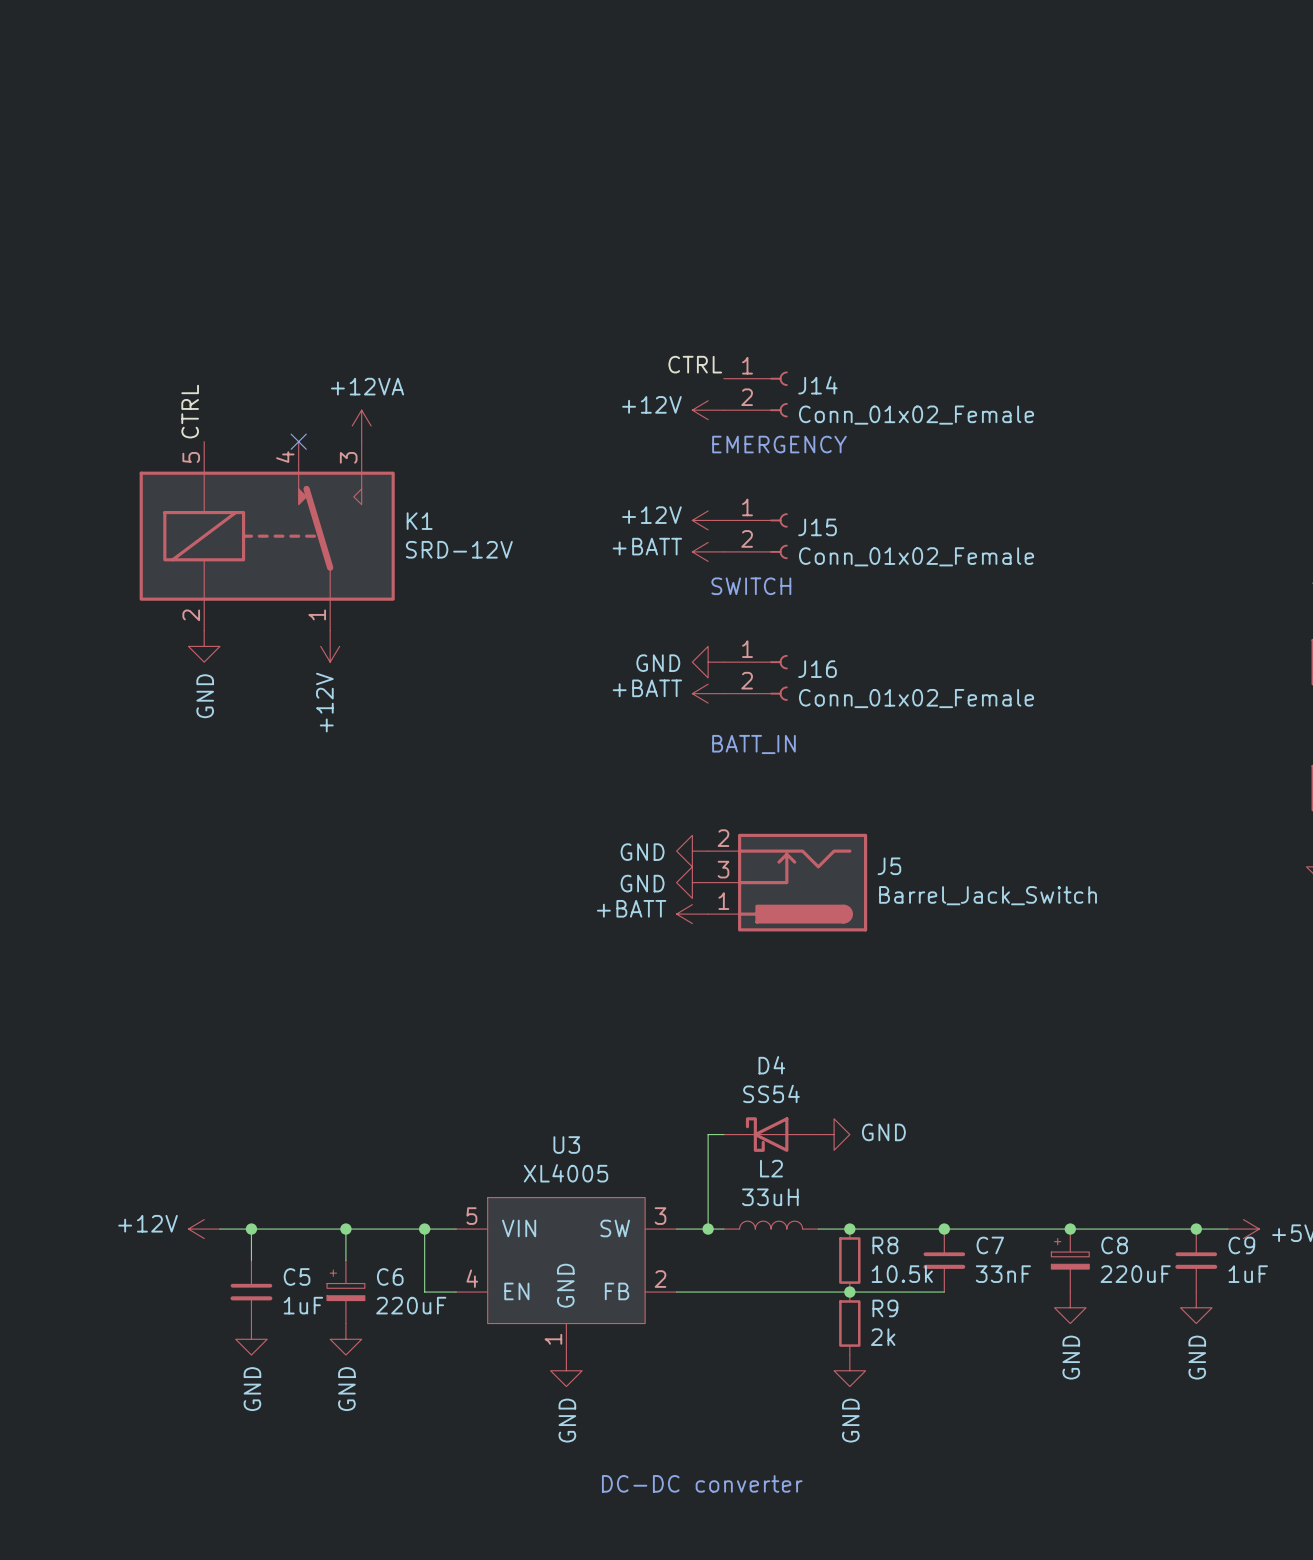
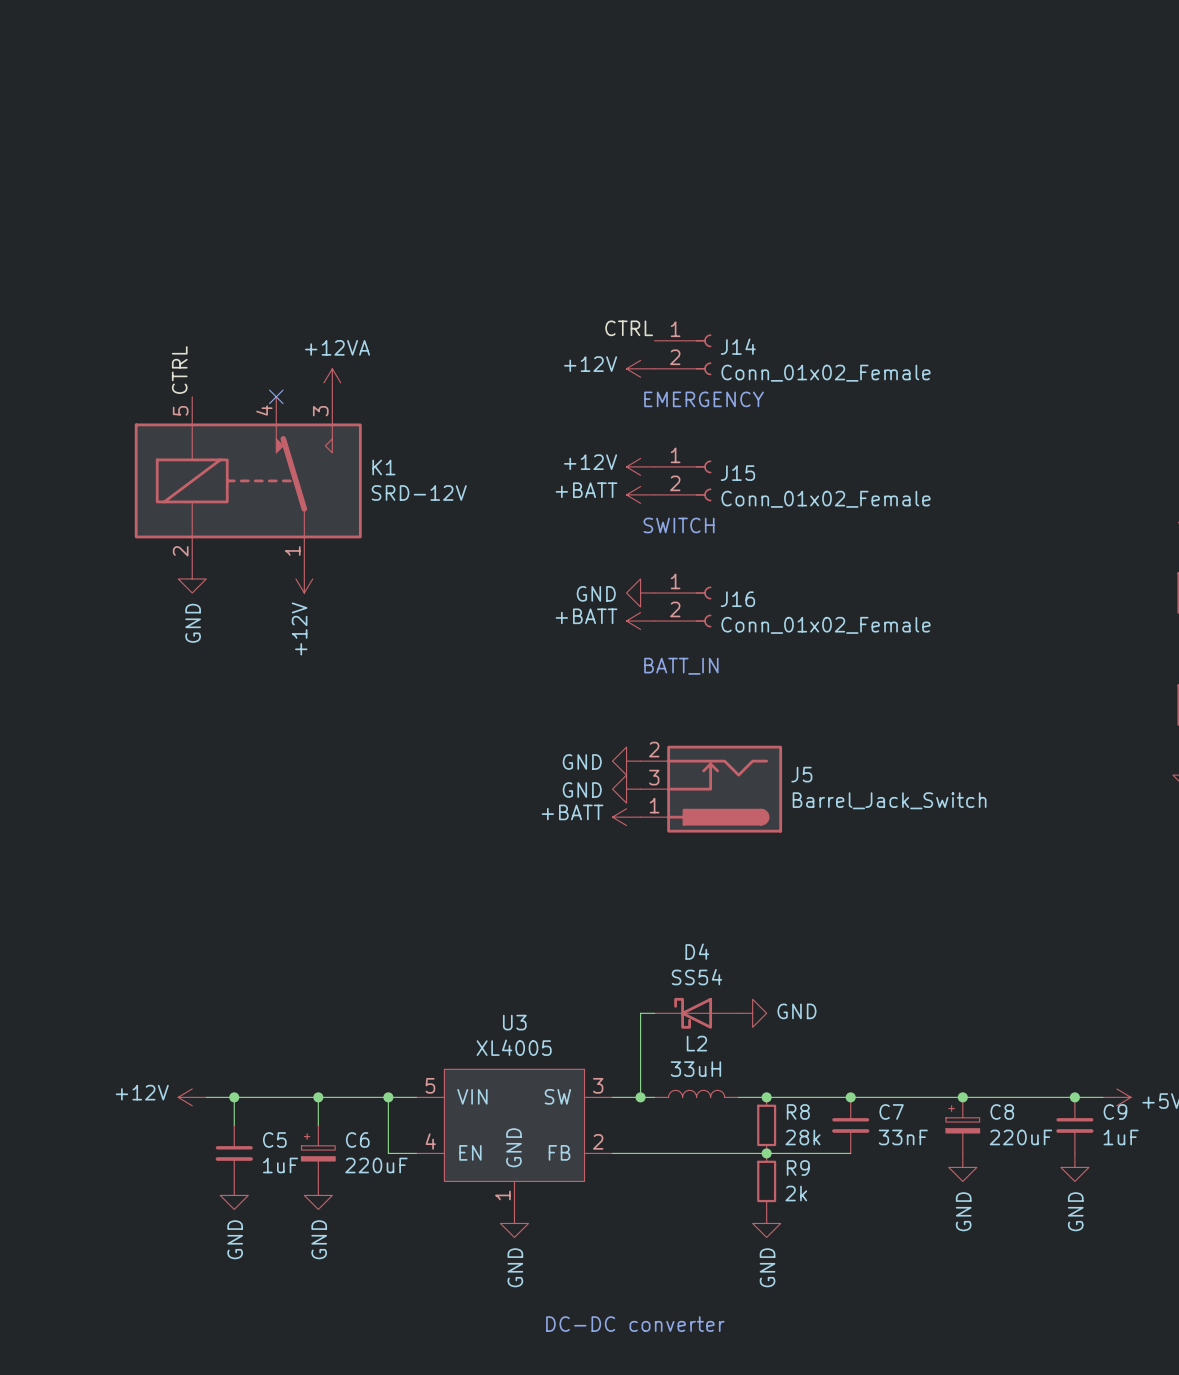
R8 value: 10.5k (902, 1274) -> 28k (802, 1137)

